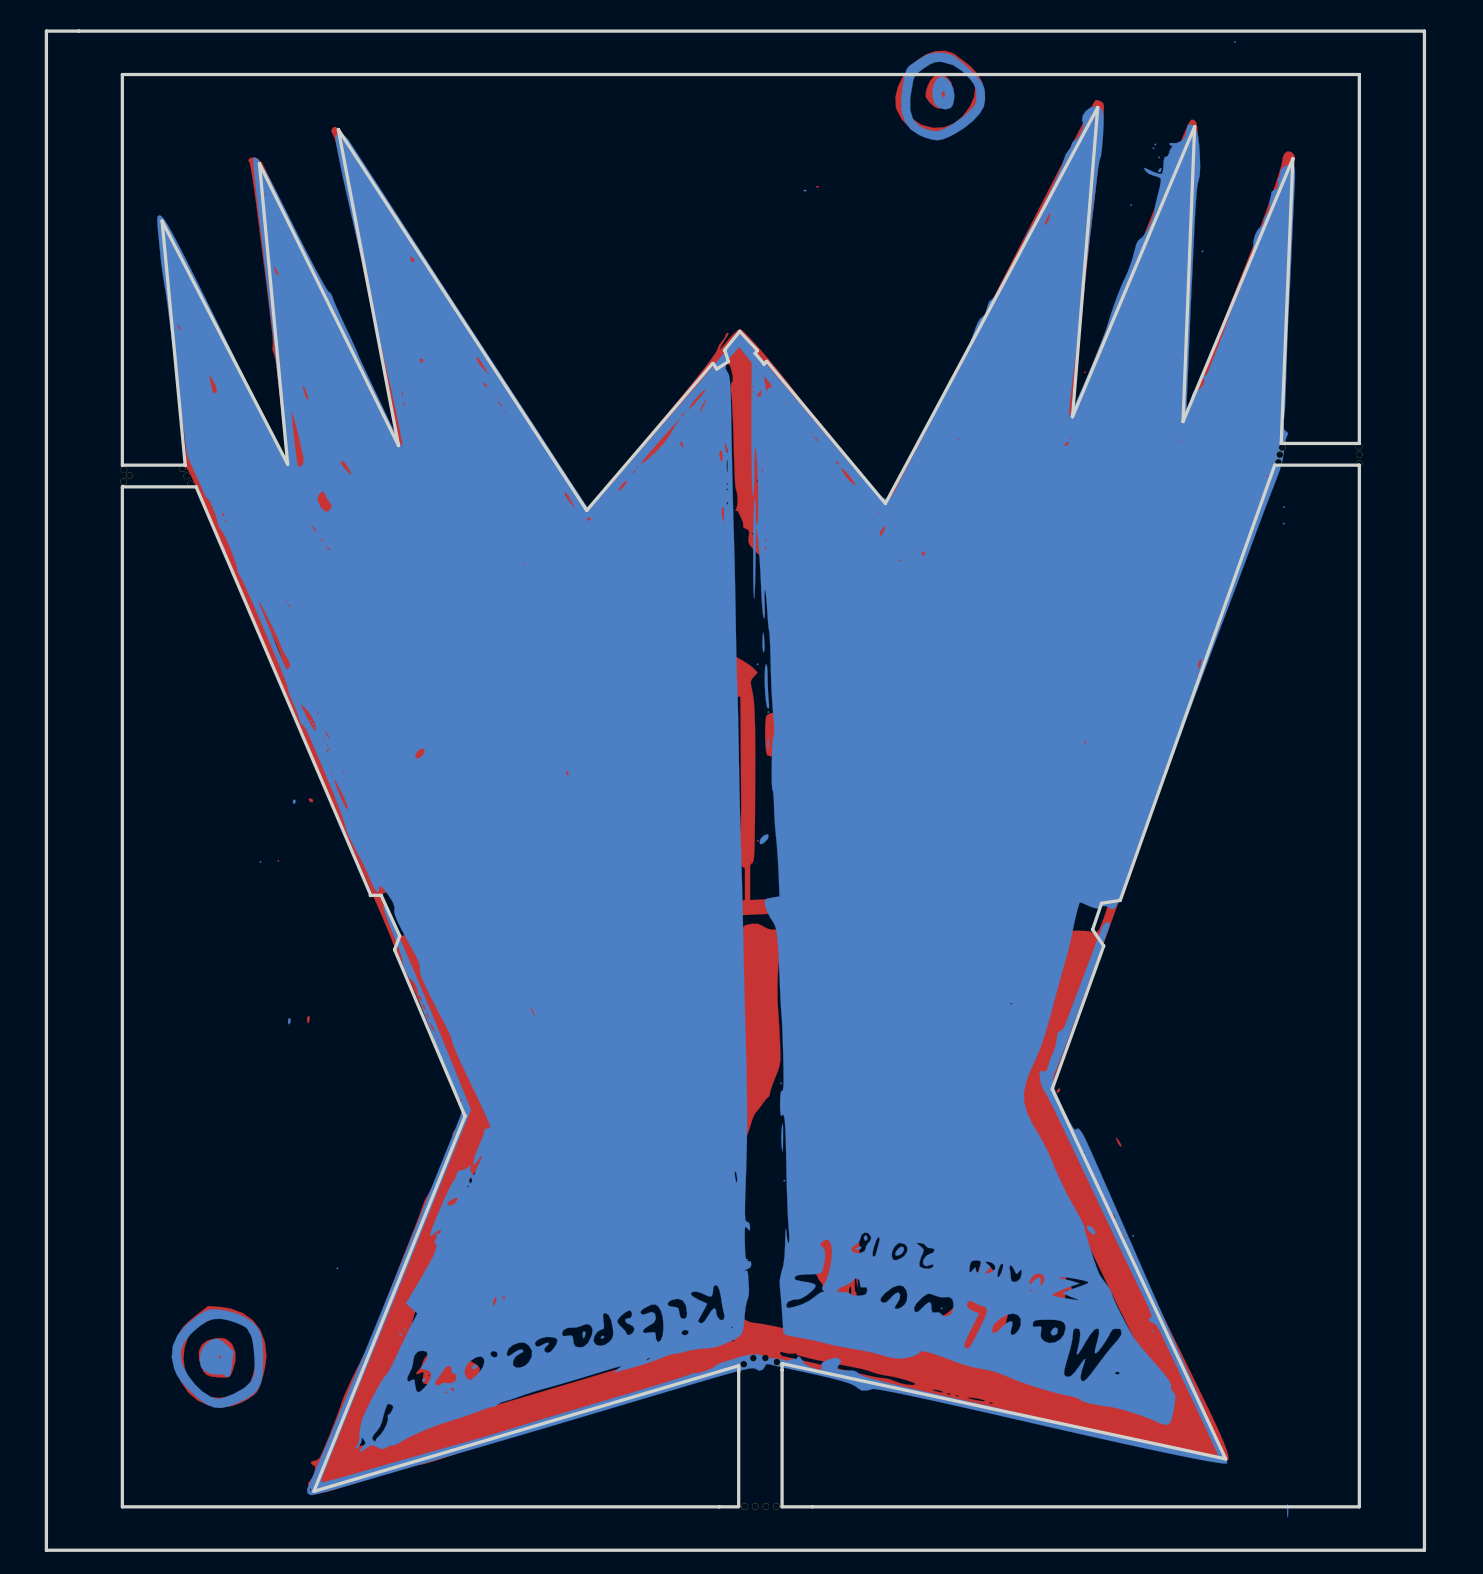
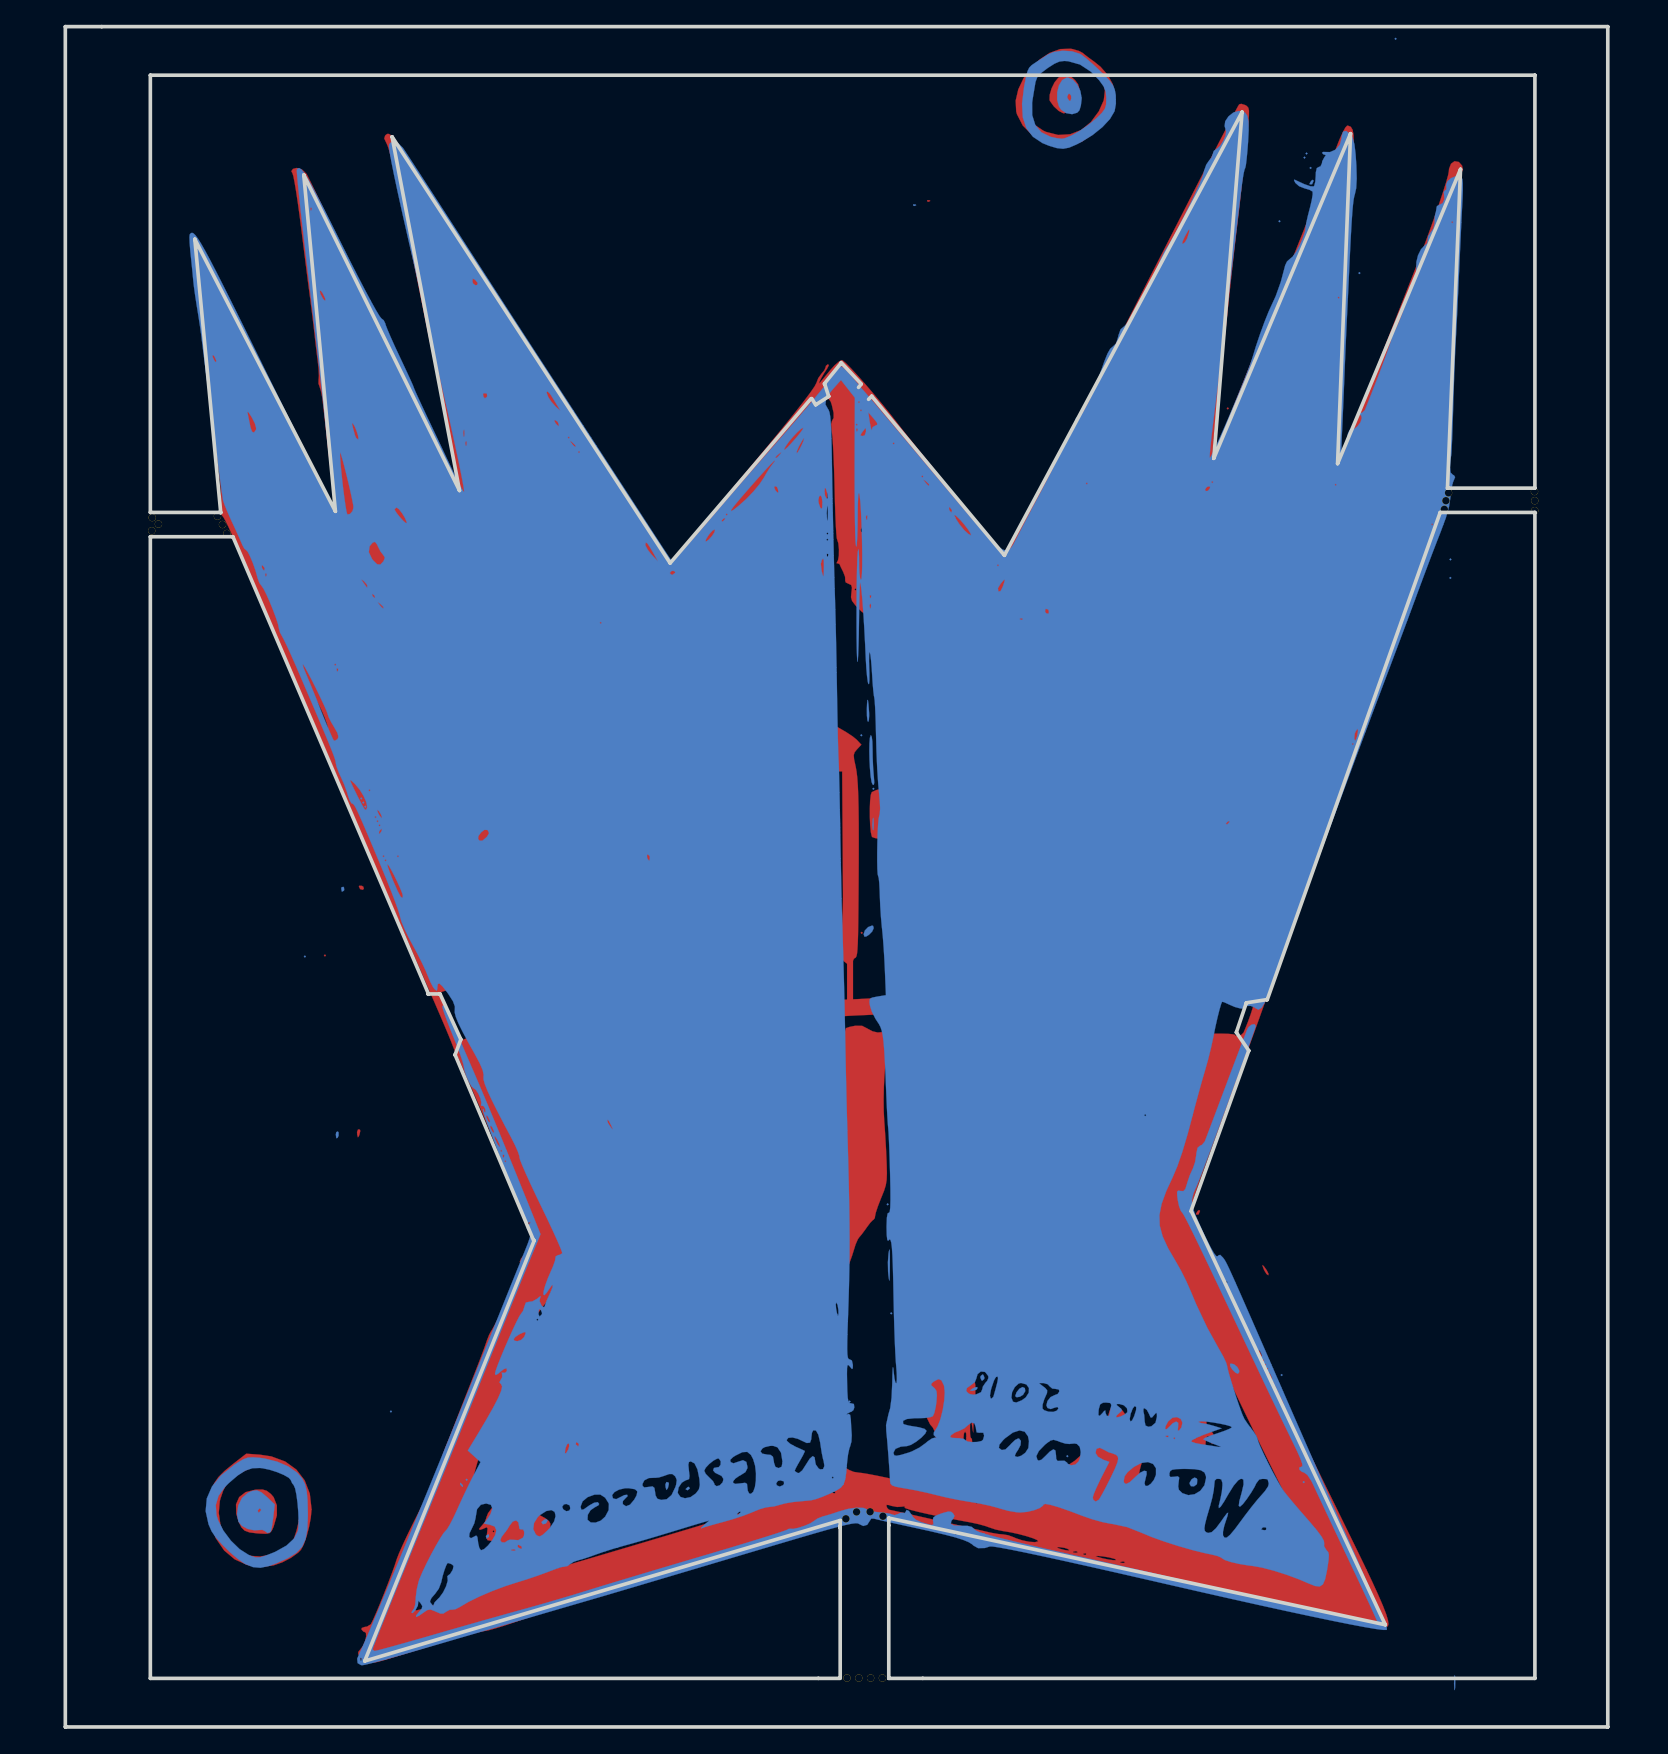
board edge: (755, 353) (764, 364) -> none

